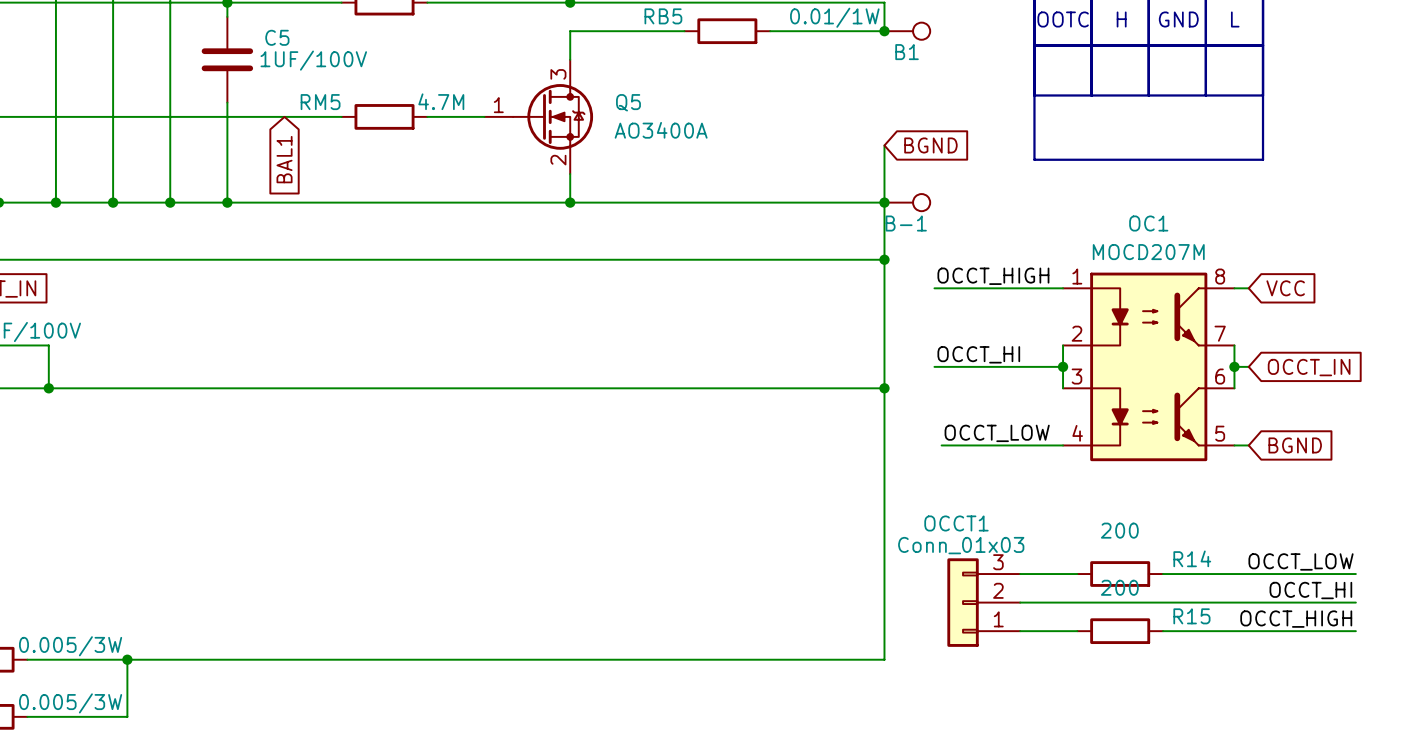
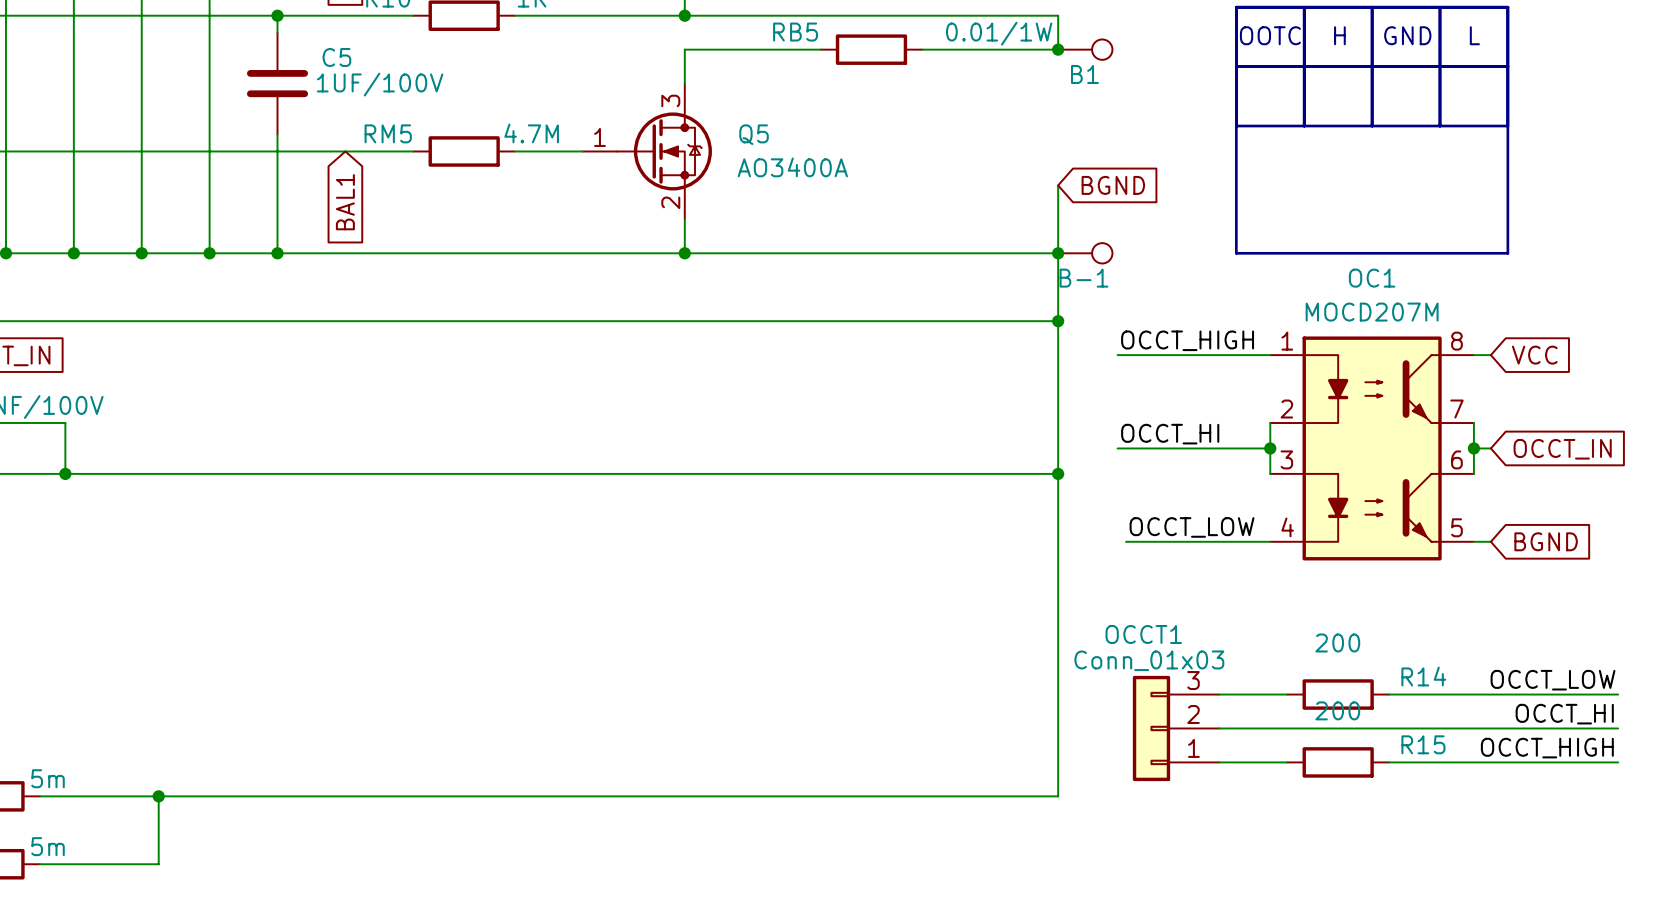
line: (1034, 159) (1263, 159) -> (1236, 202) (1236, 253) (1507, 253) (1507, 202)
part value: 0.005/3W (70, 646) -> 5m (48, 778)
part value: 0.005/3W (70, 703) -> 5m (48, 846)

